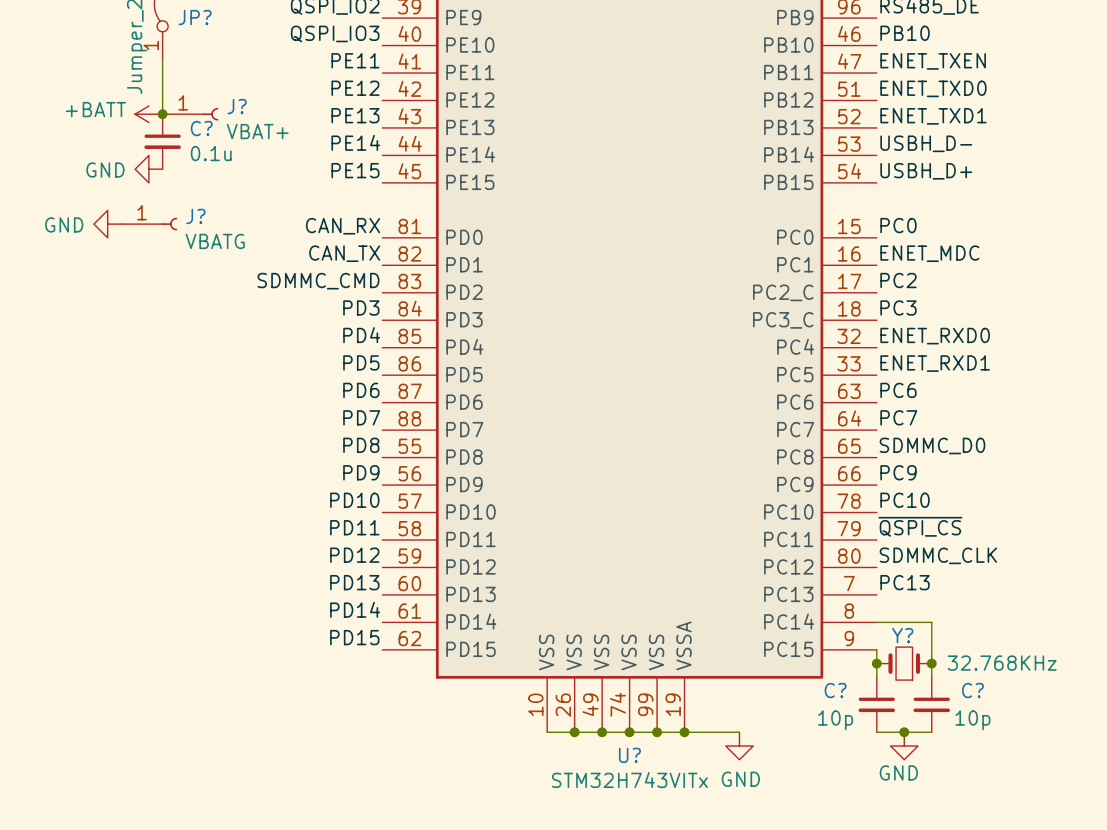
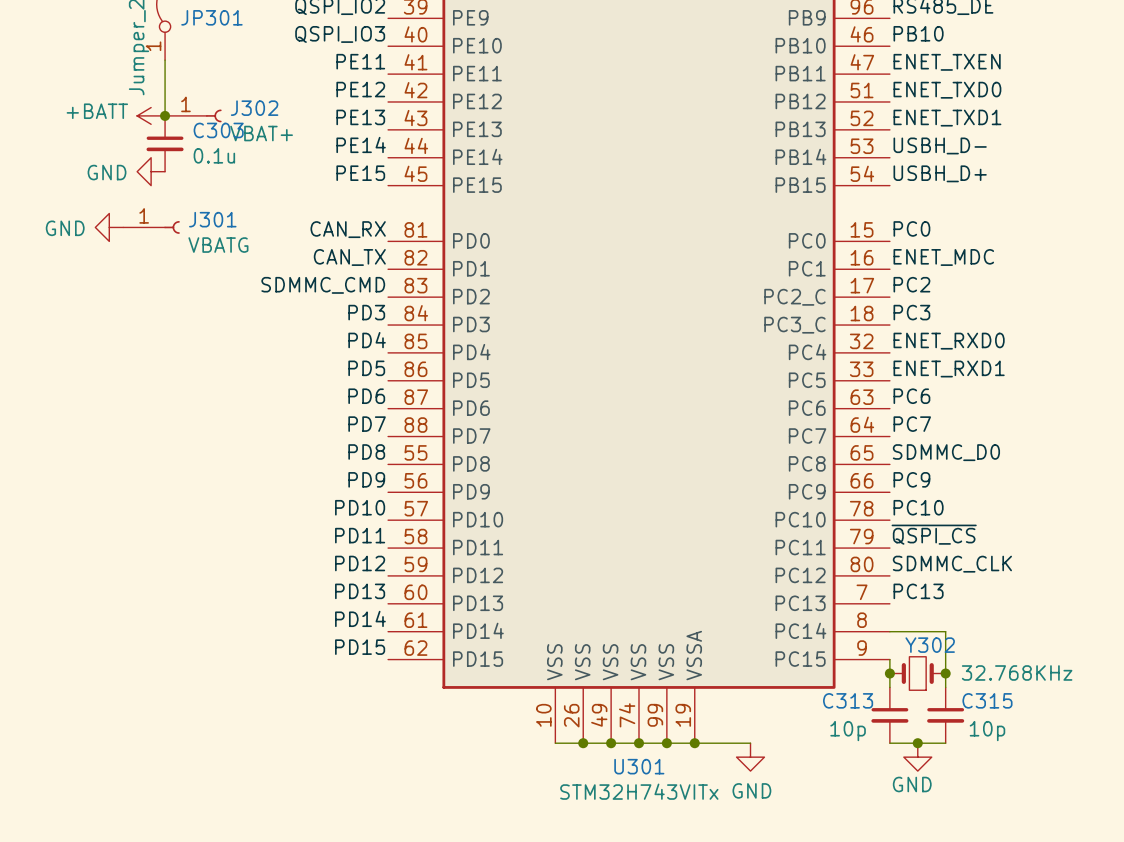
JP? name: JP? (195, 17) -> JP301 (211, 17)
J? name: J? (237, 106) -> J302 (254, 108)
C? name: C? (201, 128) -> C303 (218, 130)
J? name: J? (195, 216) -> J301 (212, 219)
Y? name: Y? (902, 635) -> Y302 (930, 645)
C? name: C? (835, 690) -> C313 (848, 700)
C? name: C? (972, 690) -> C315 (987, 700)
U? name: U? (629, 755) -> U301 (639, 766)

